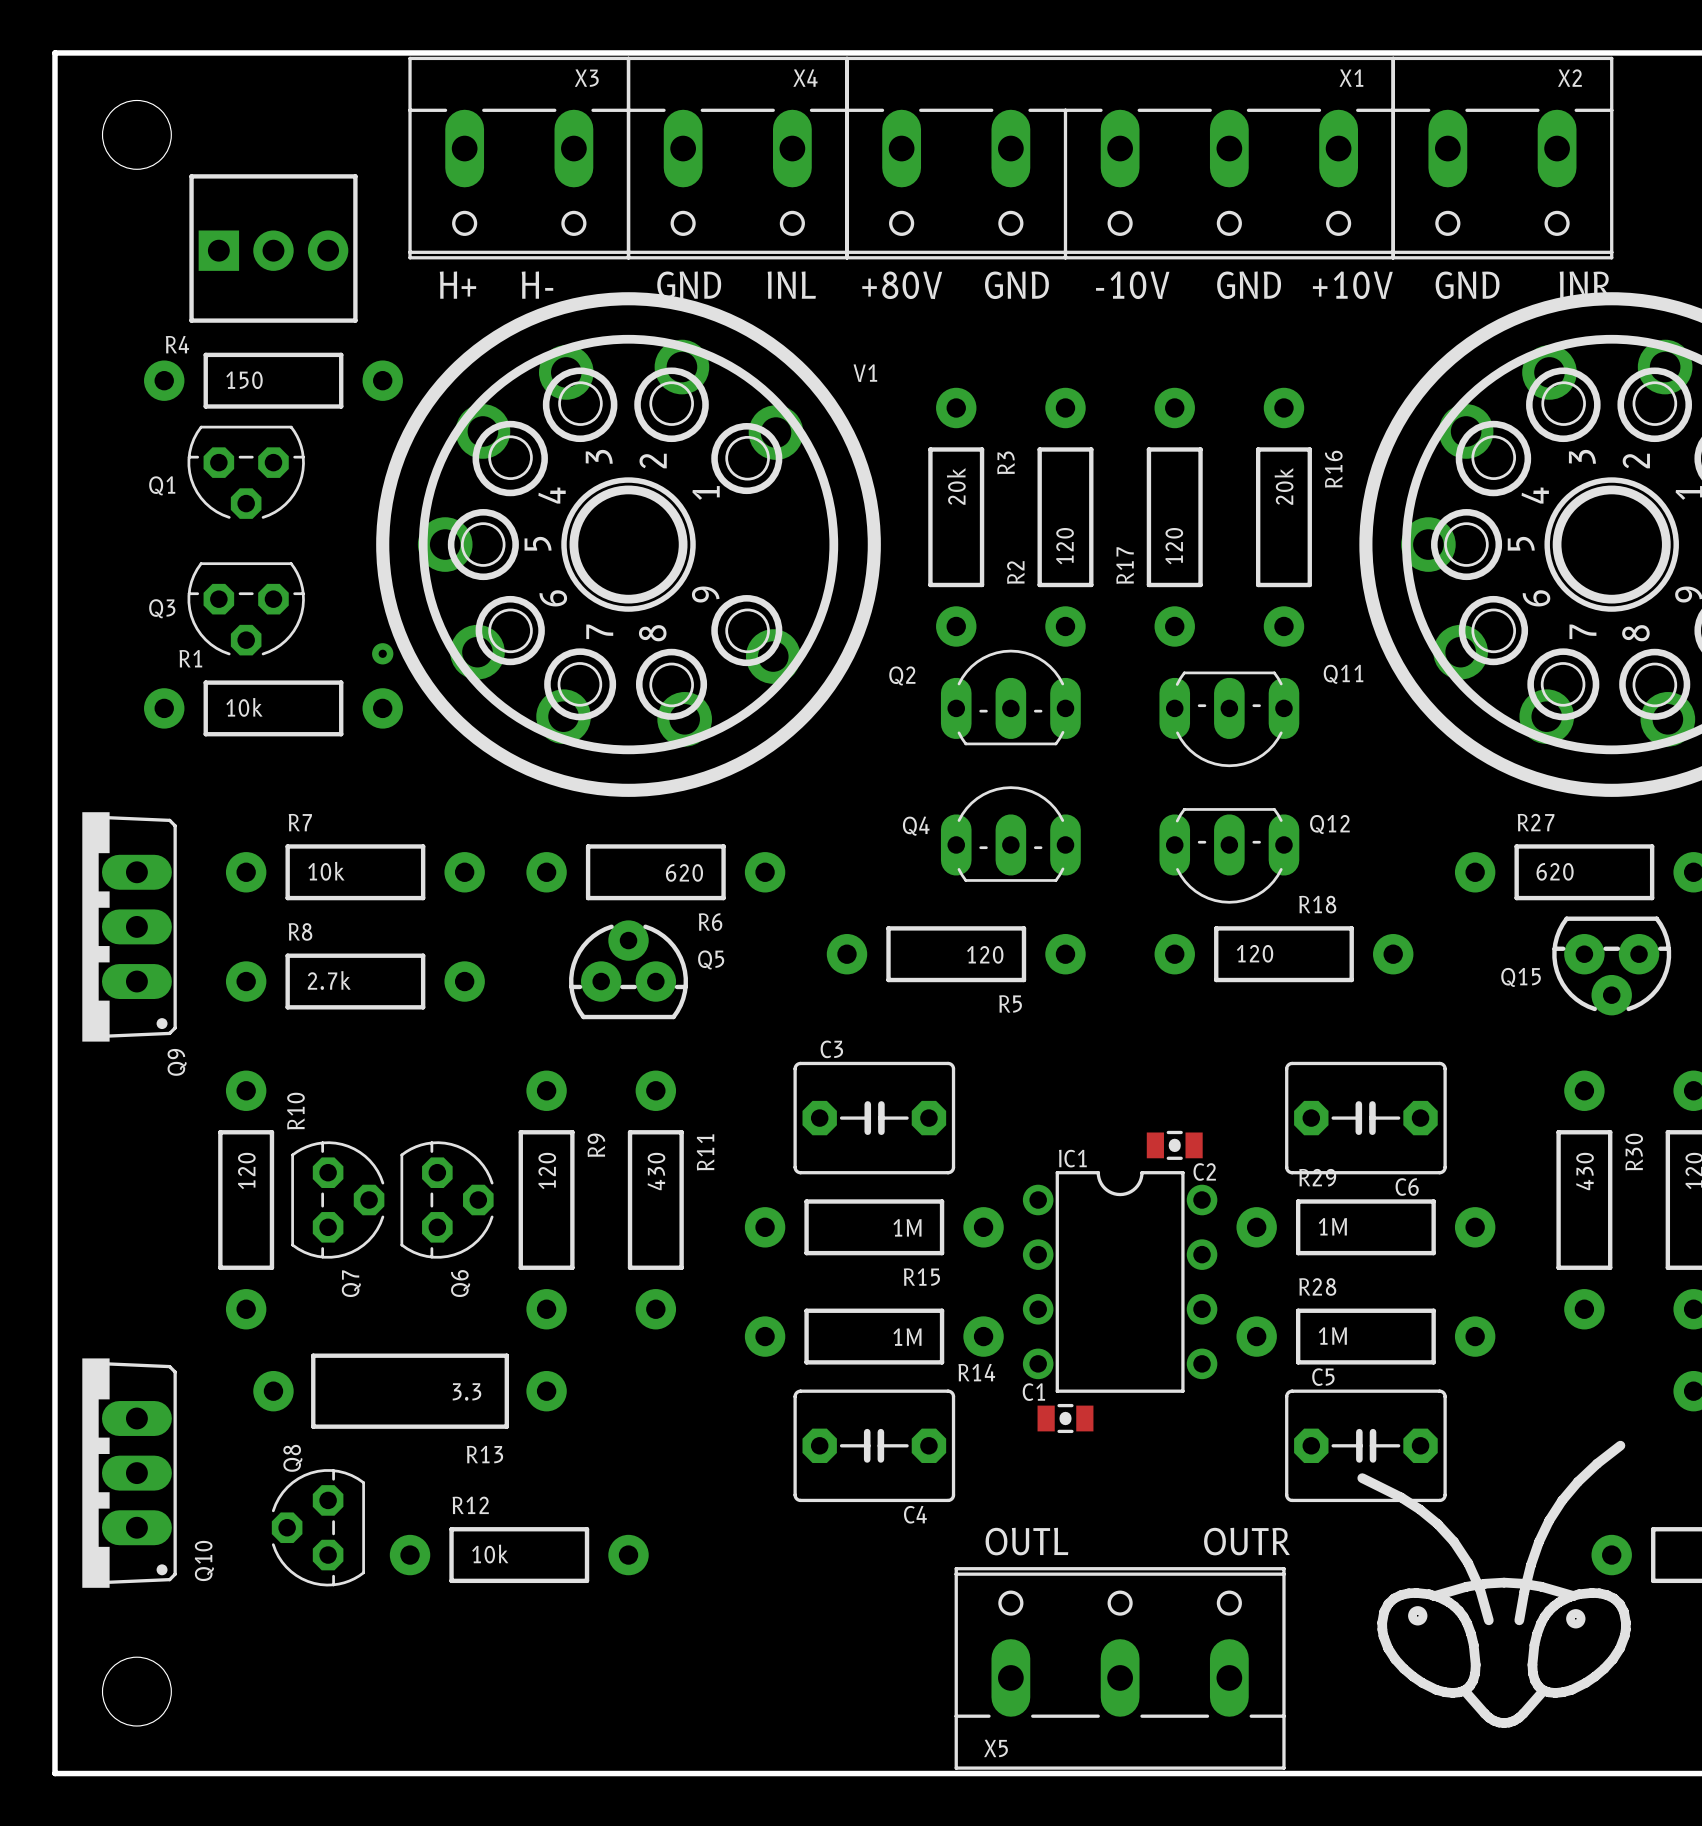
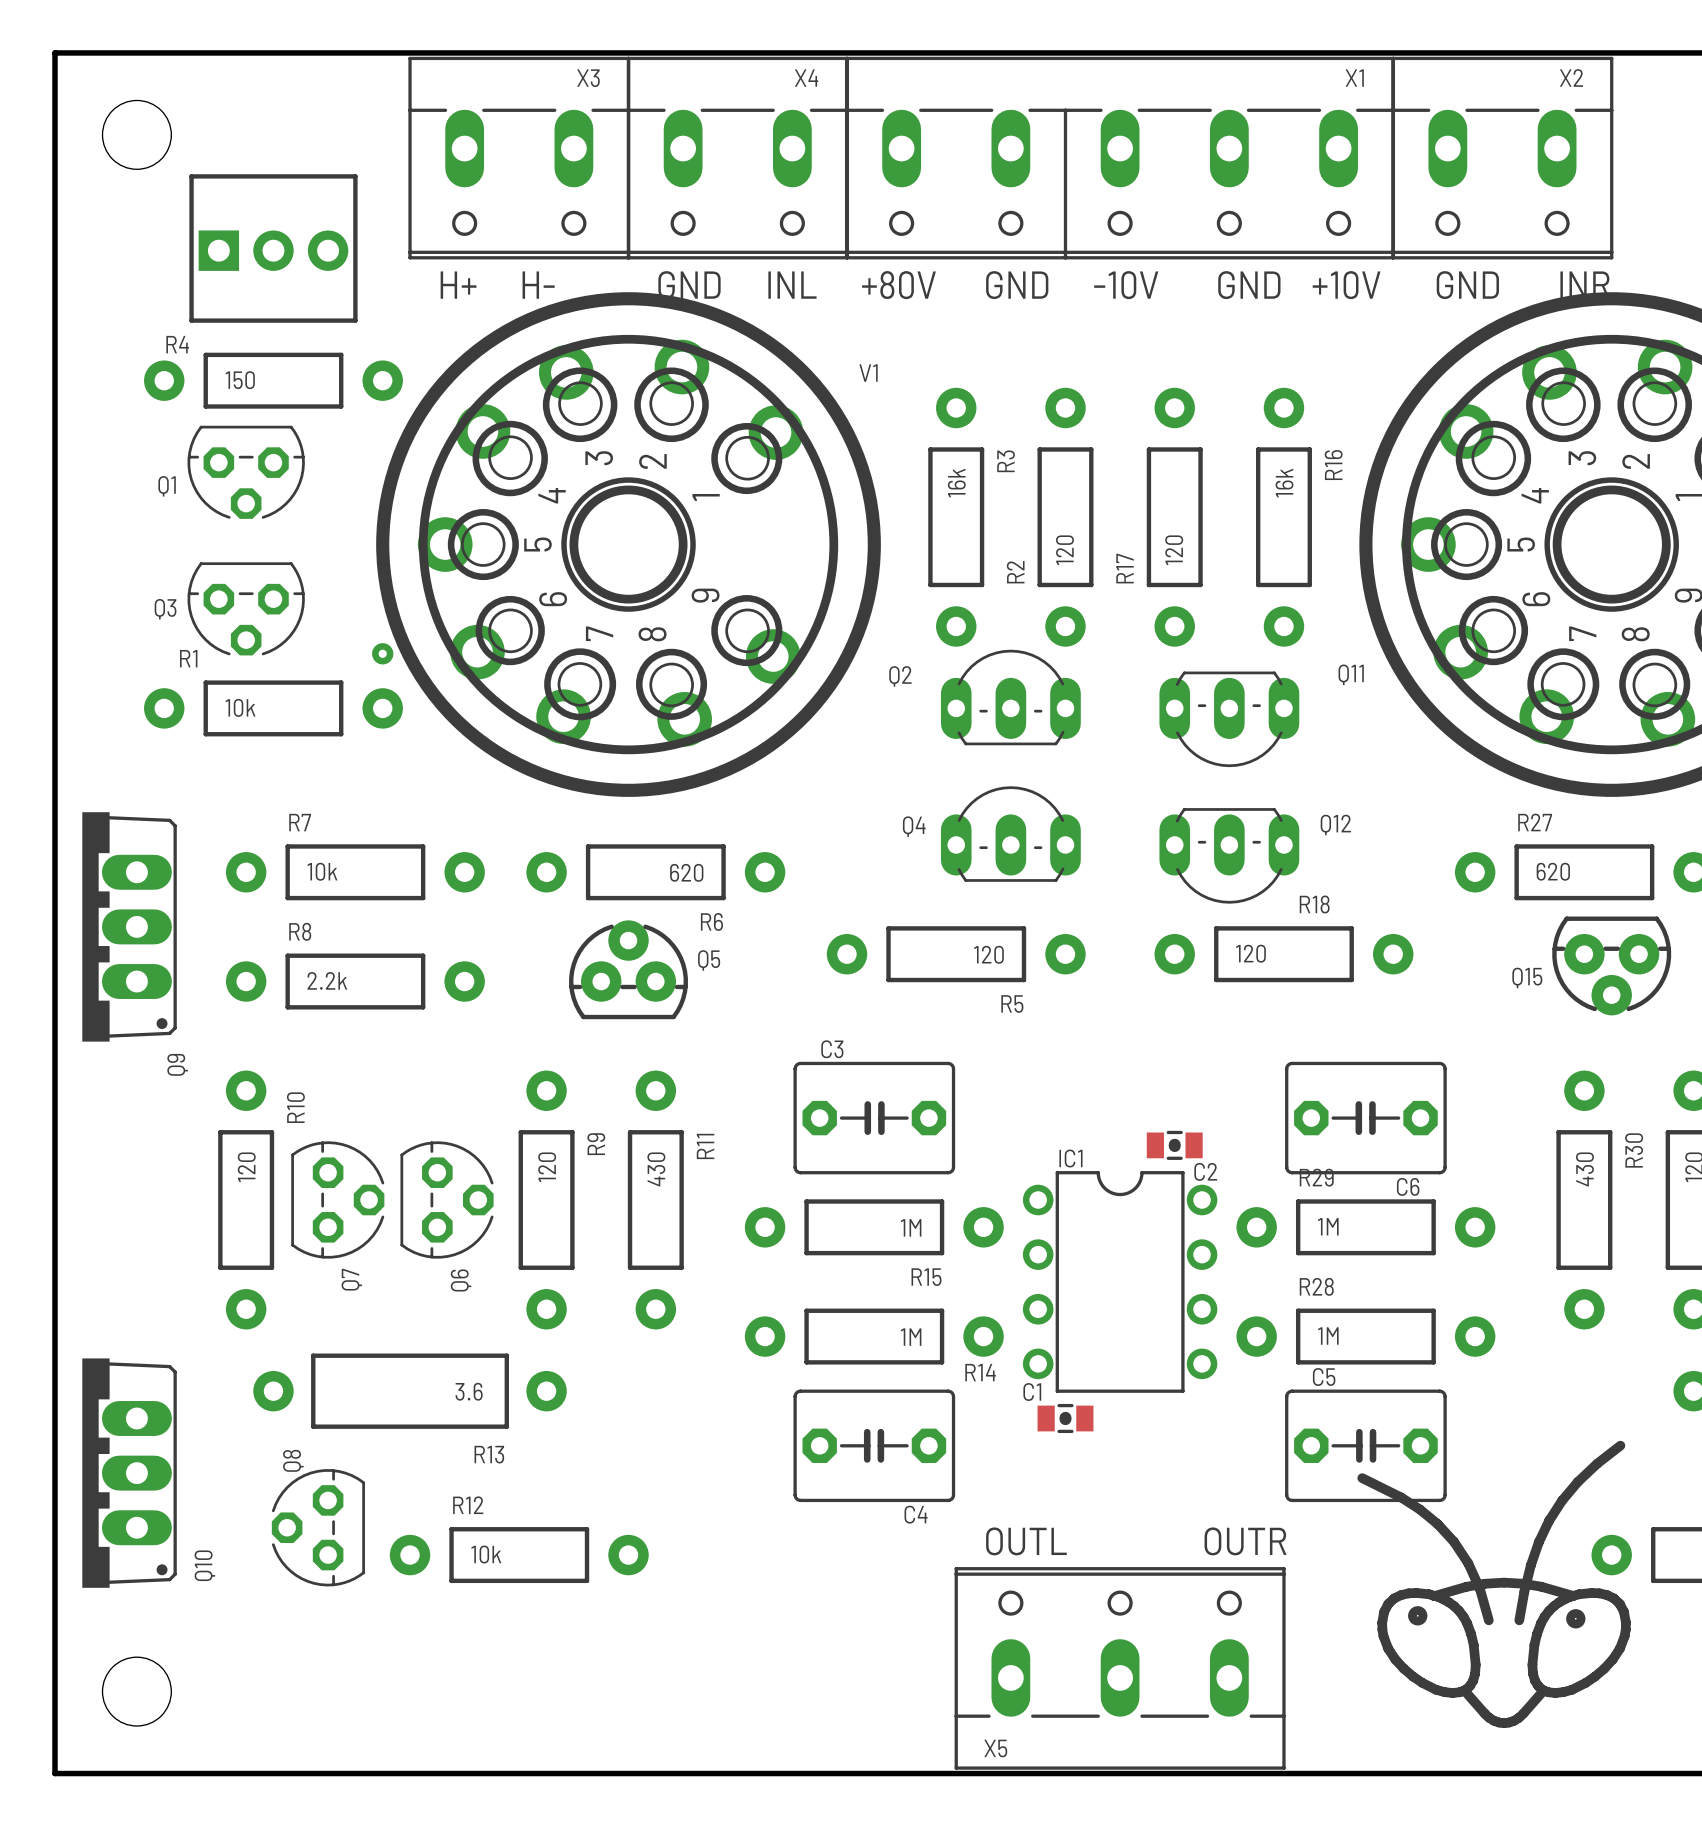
R3 value: 20k (956, 486) -> 16k (956, 483)
R16 value: 20k (1284, 486) -> 16k (1284, 483)
R8 value: 2.7k (329, 980) -> 2.2k (327, 980)
R13 value: 3.3 (466, 1391) -> 3.6 (469, 1391)

